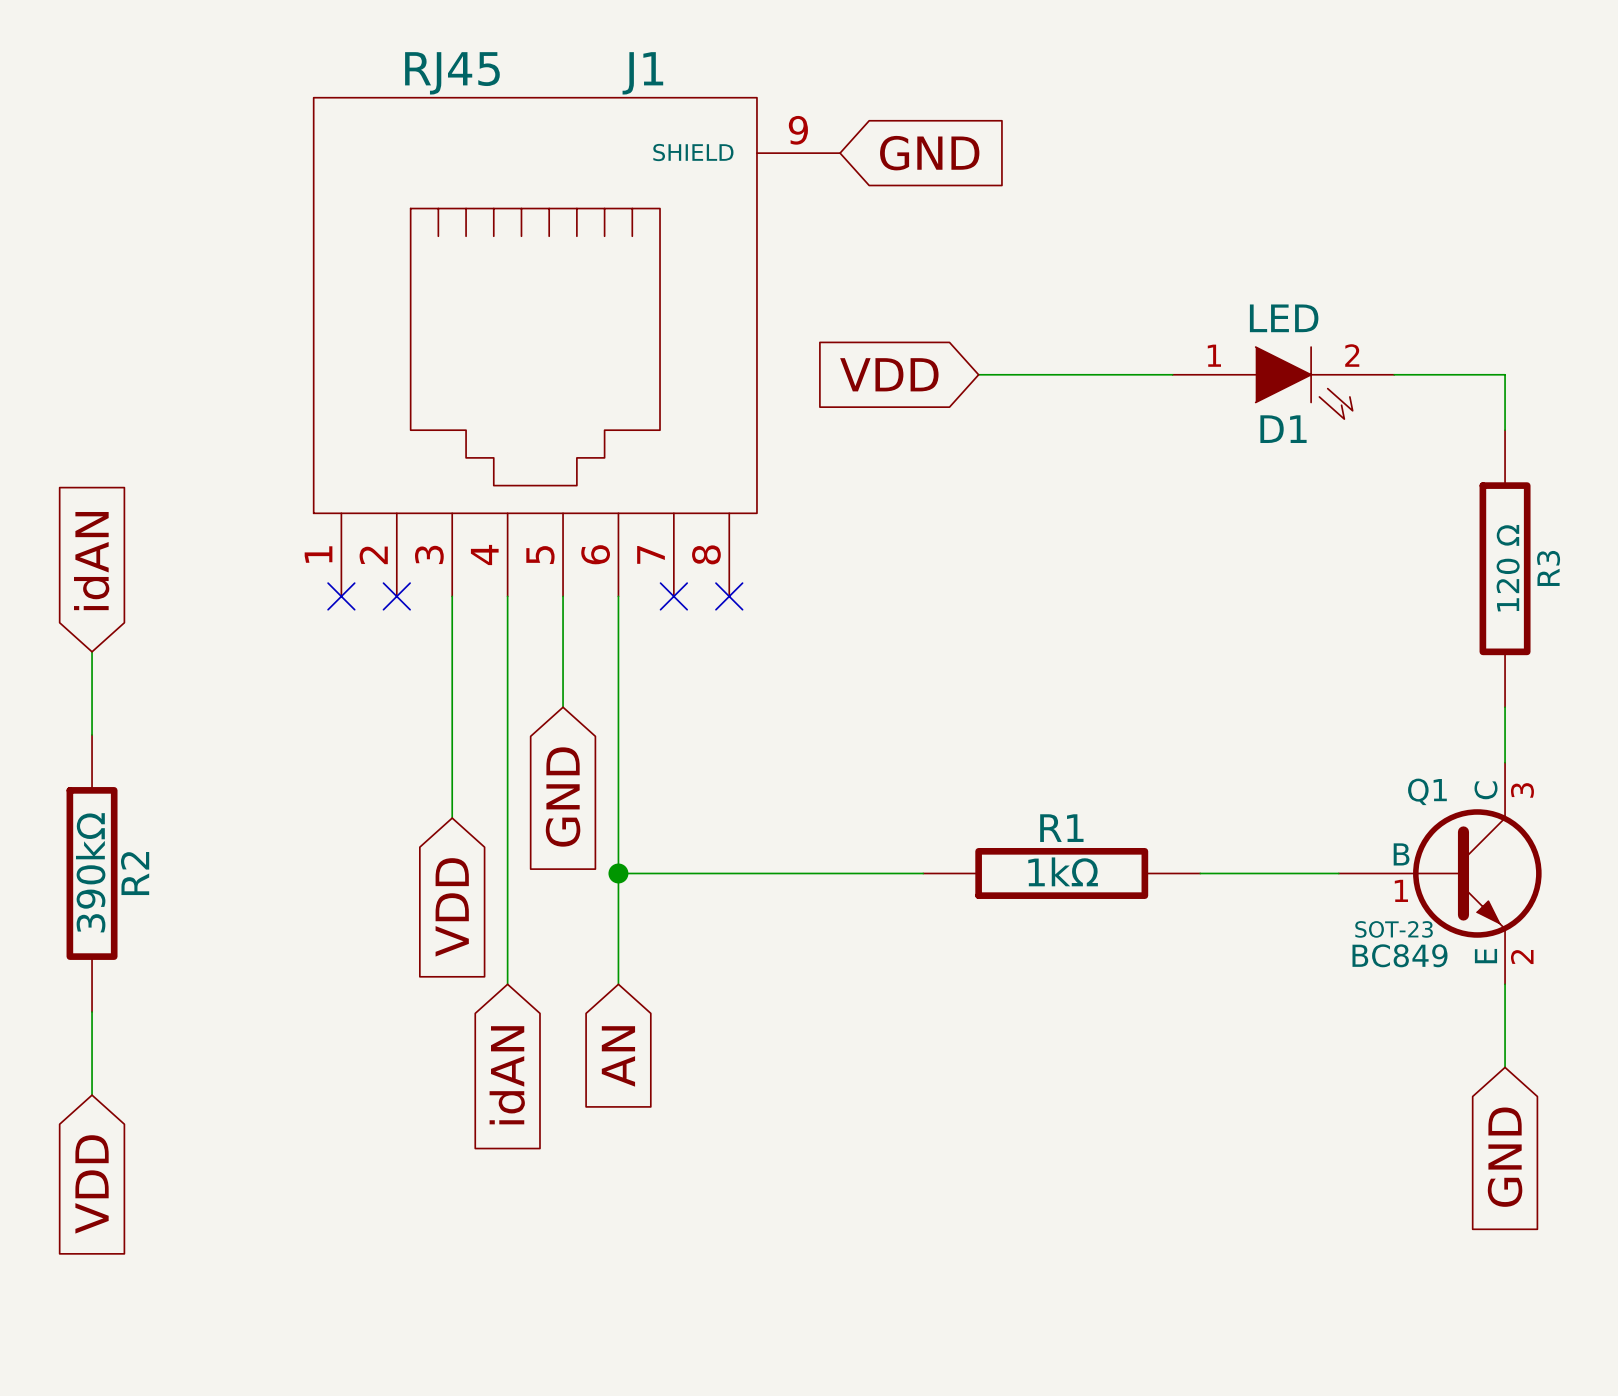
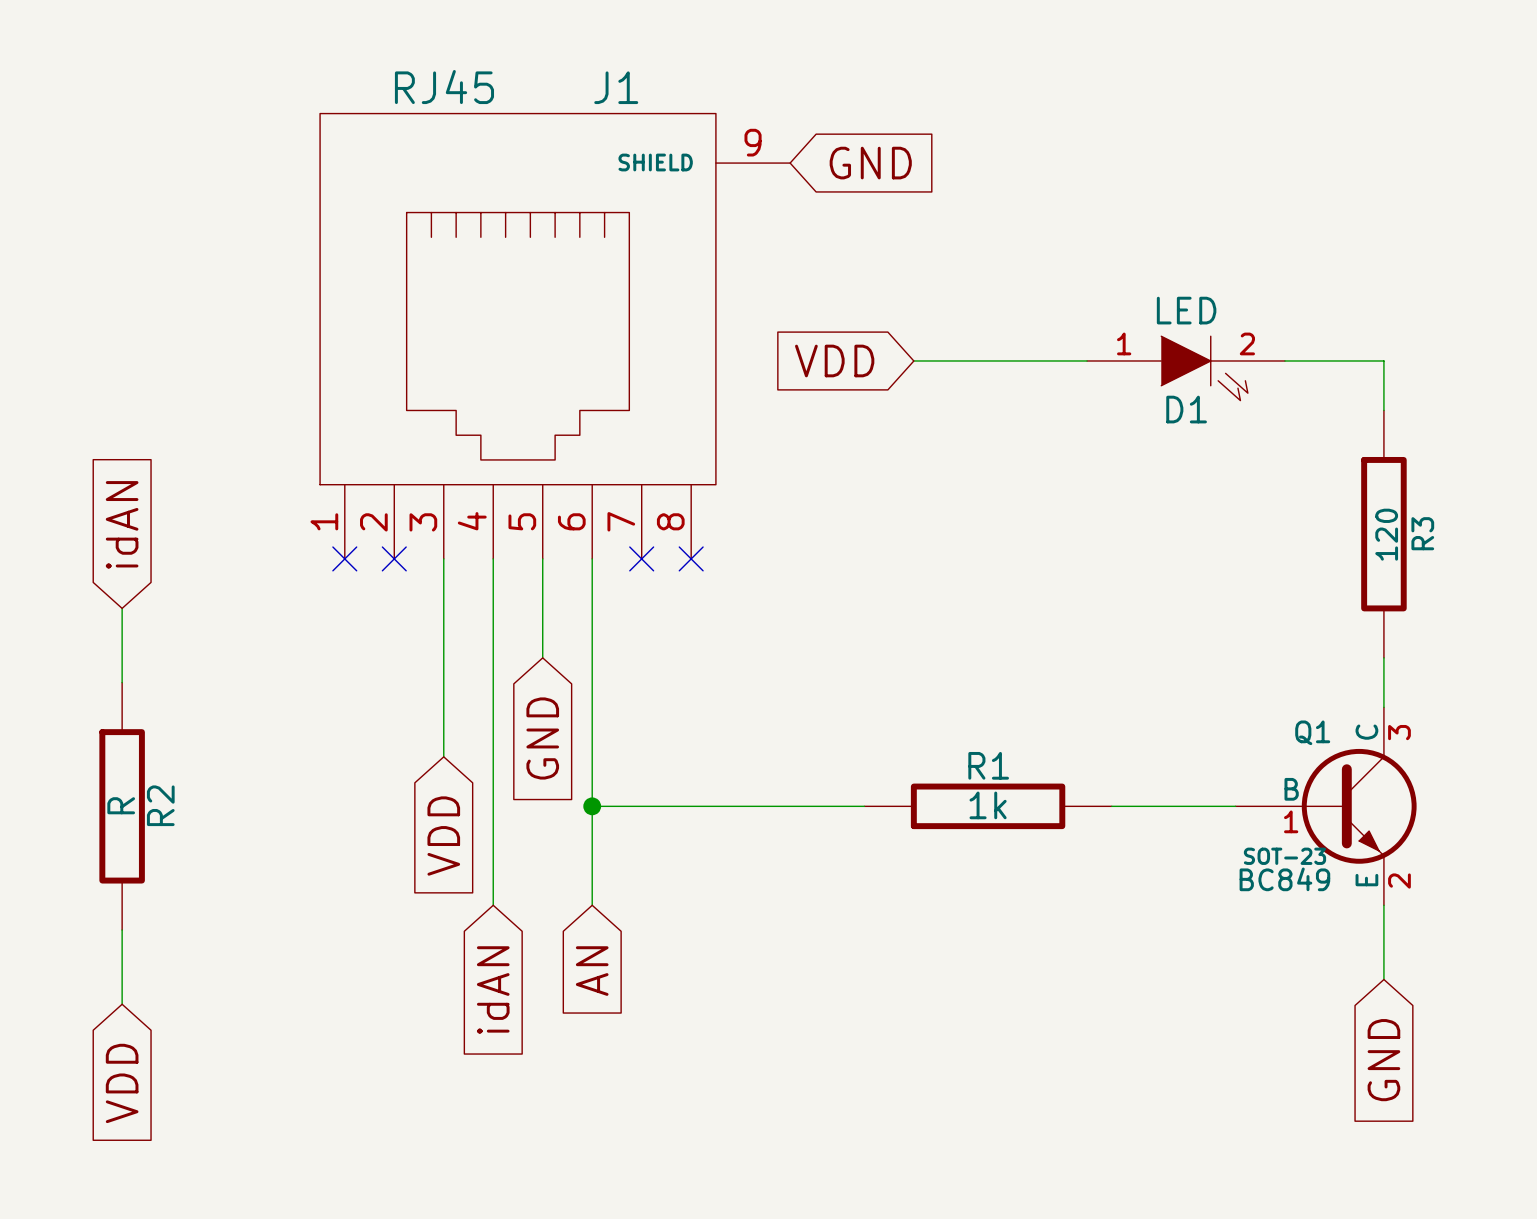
R3 value: 120 Ω (1508, 568) -> 120 (1386, 534)
R1 value: 1kΩ (1063, 871) -> 1k (988, 805)
R2 value: 390kΩ (90, 872) -> R (121, 805)

